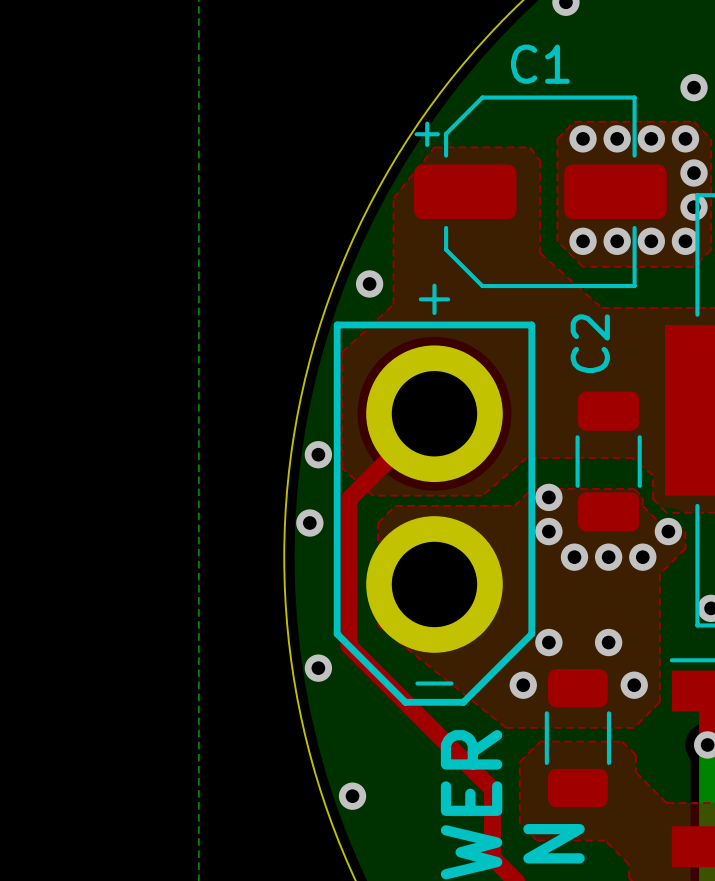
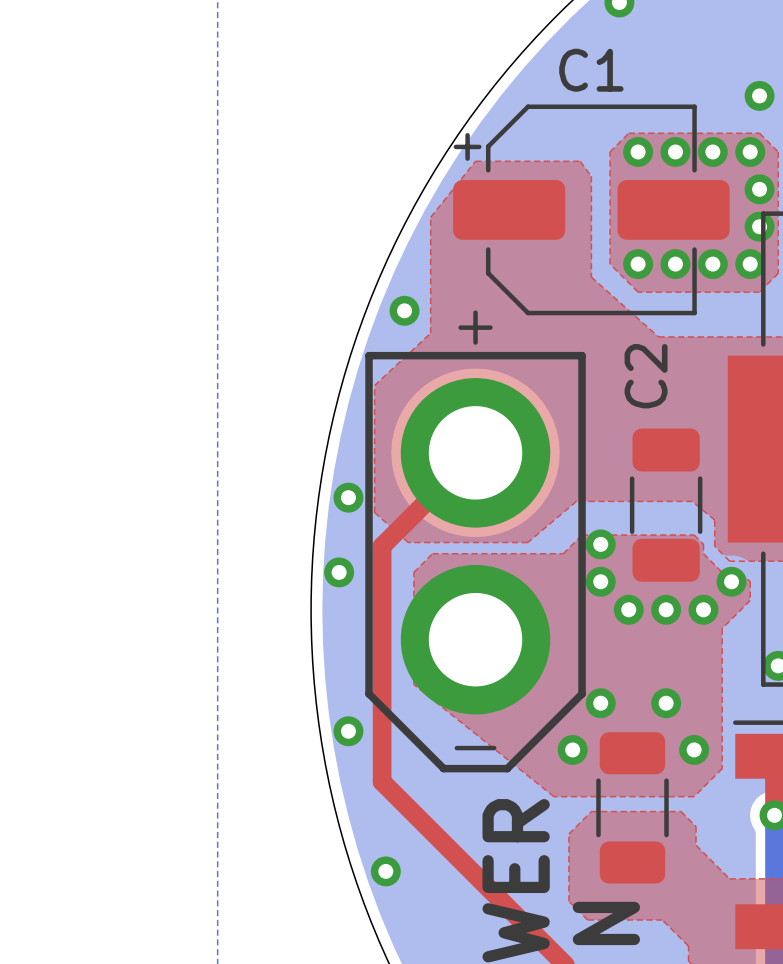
top track: (349, 645) (492, 789) (492, 857) -> (382, 706) (382, 781) (539, 938)

